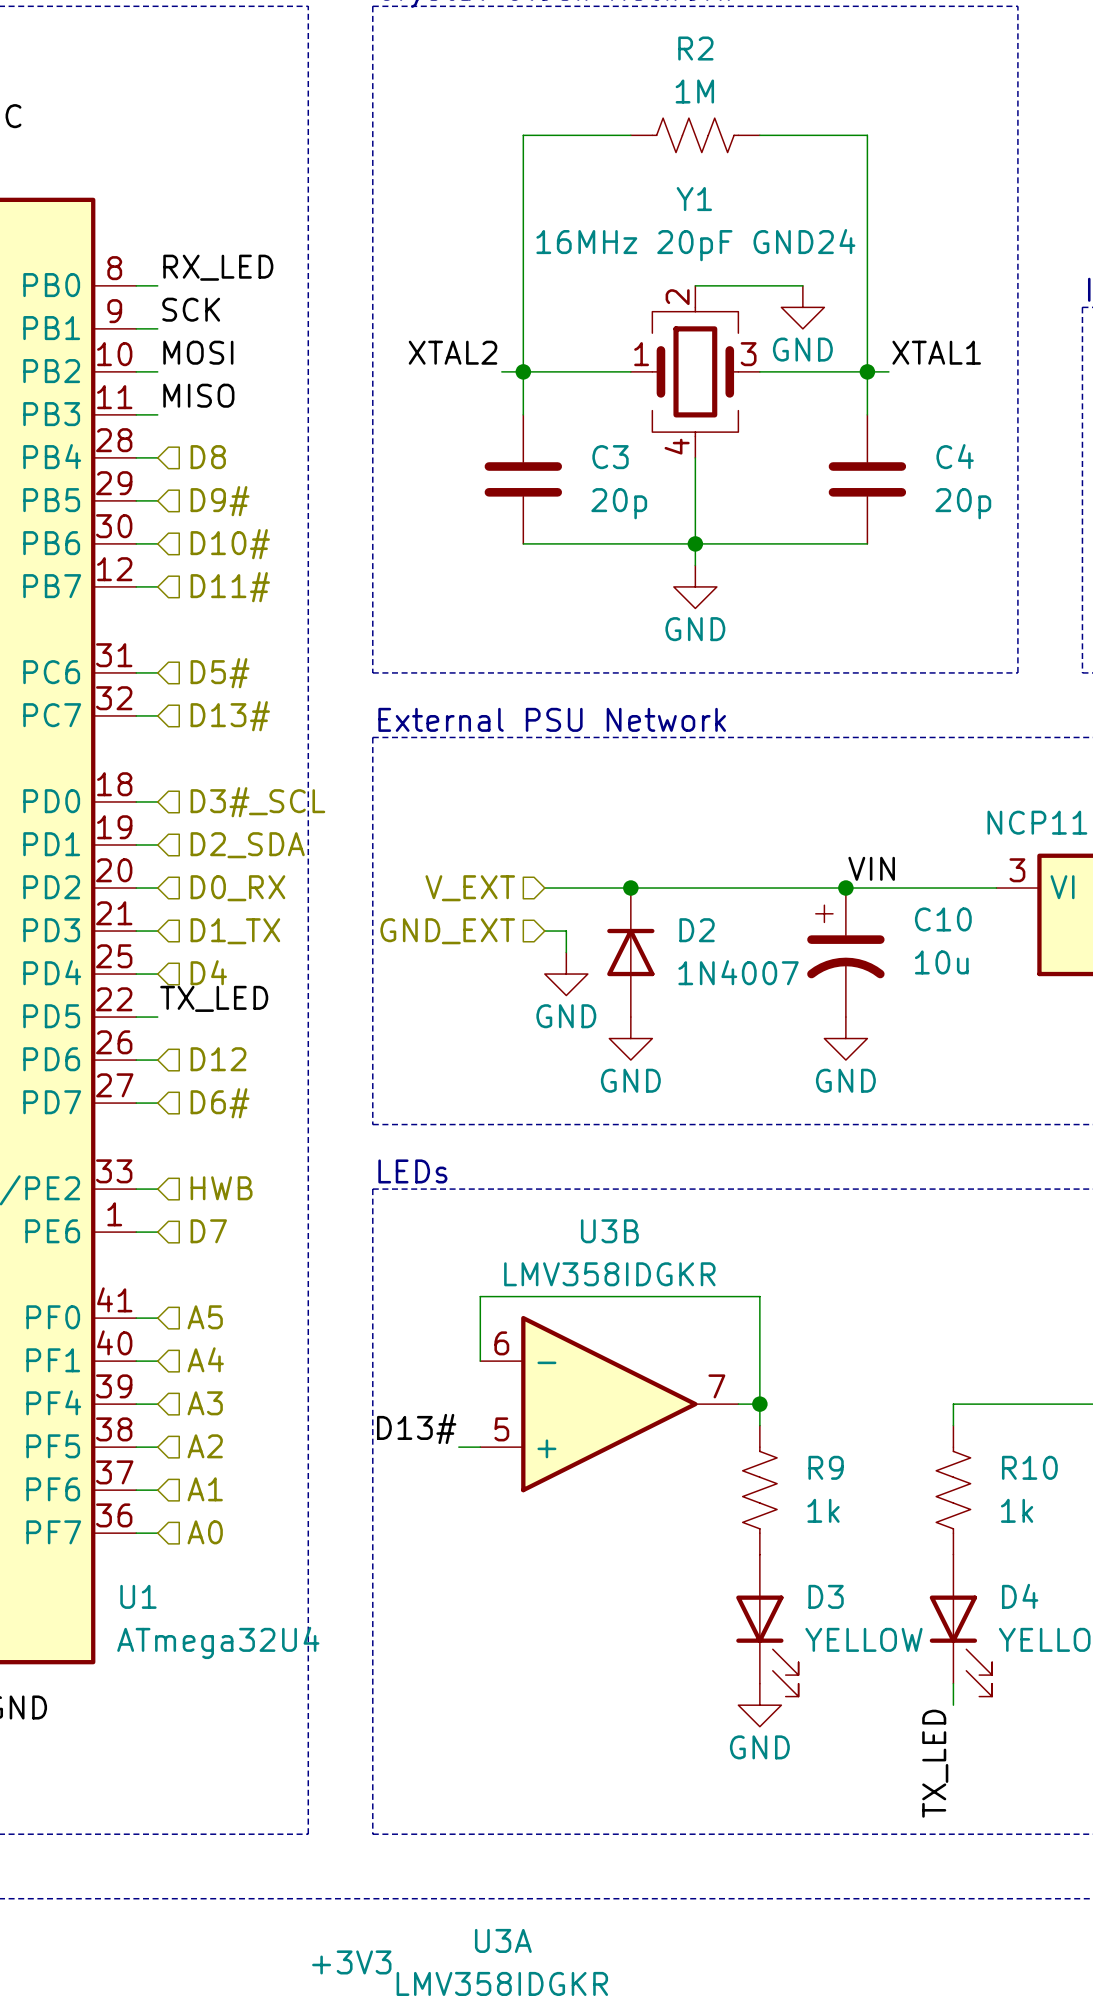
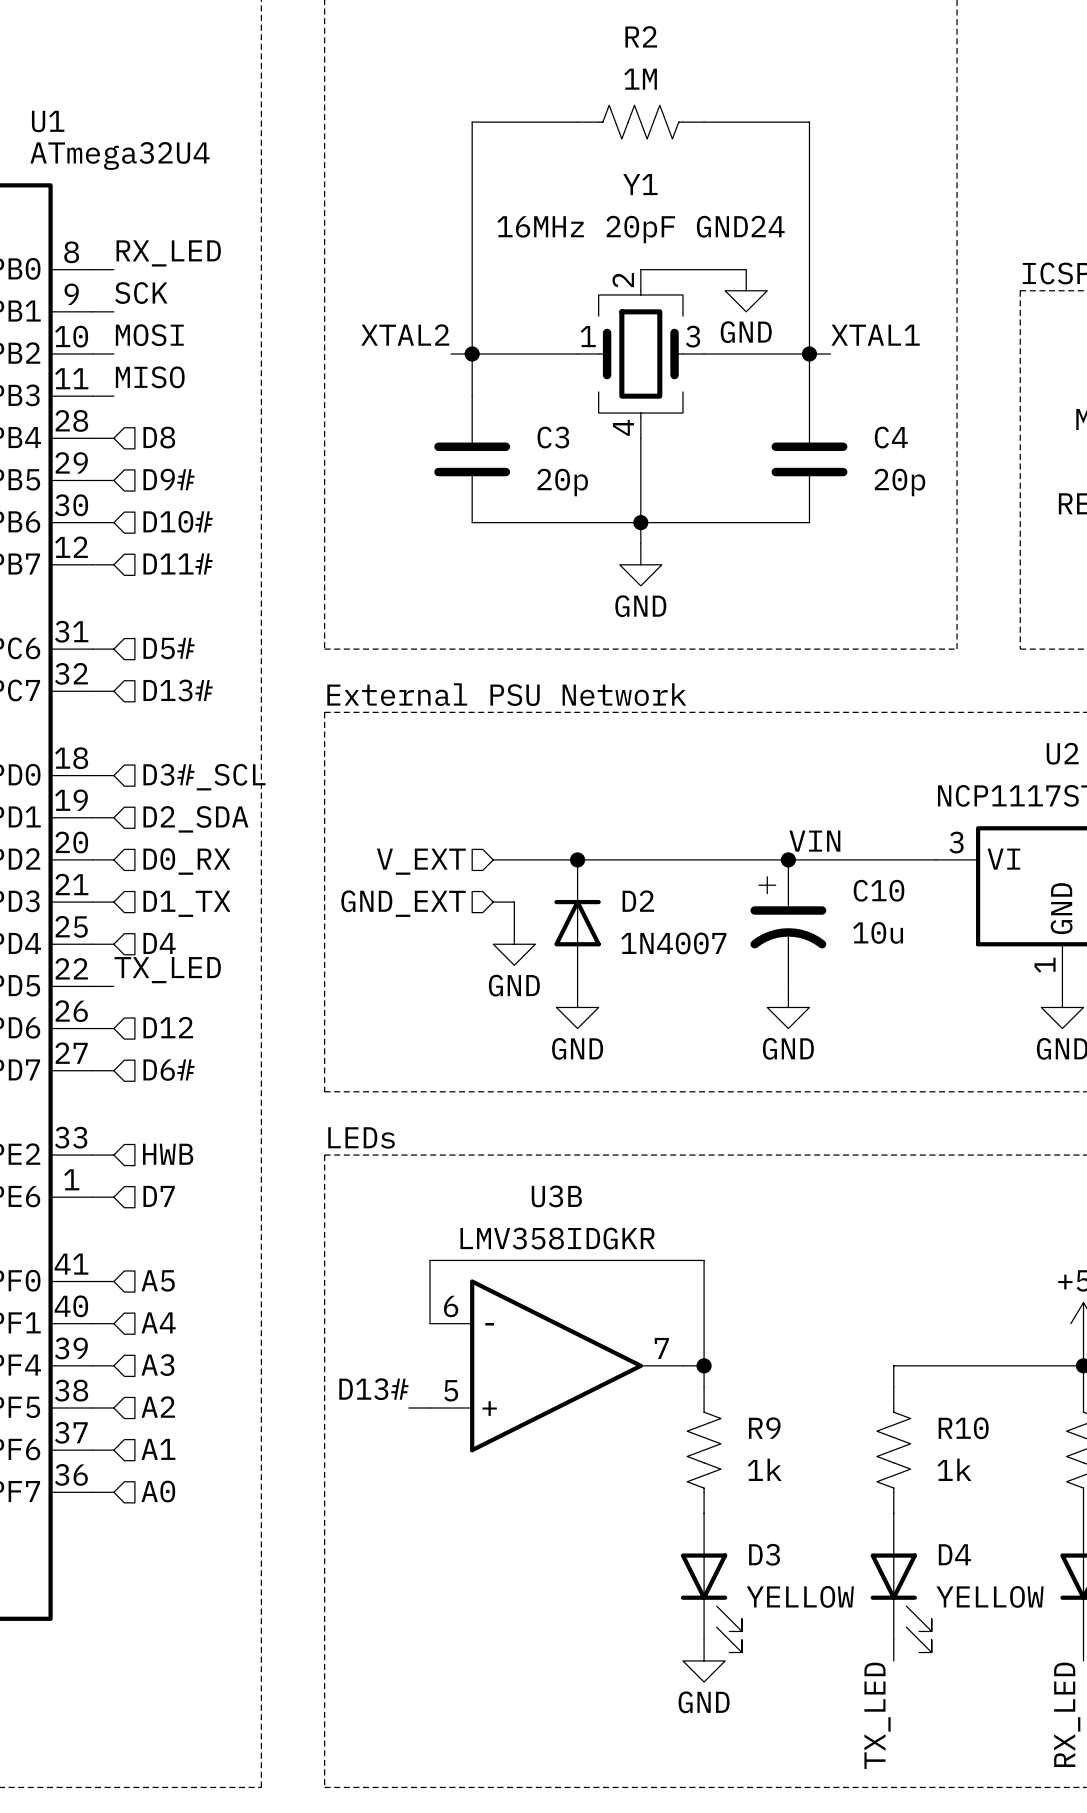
U1 name position: U1 (138, 1596) -> U1 (48, 121)
U1 value position: ATmega32U4 (218, 1642) -> ATmega32U4 (120, 155)

